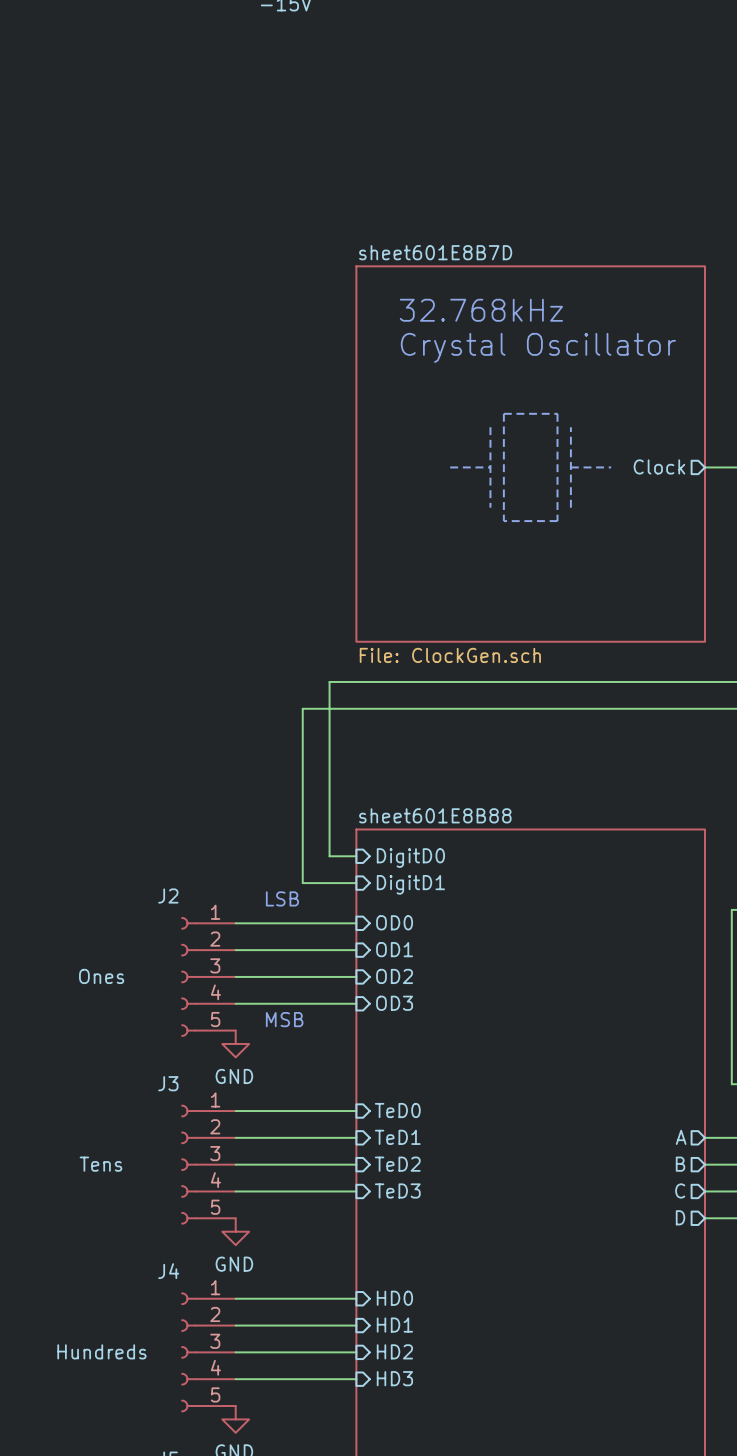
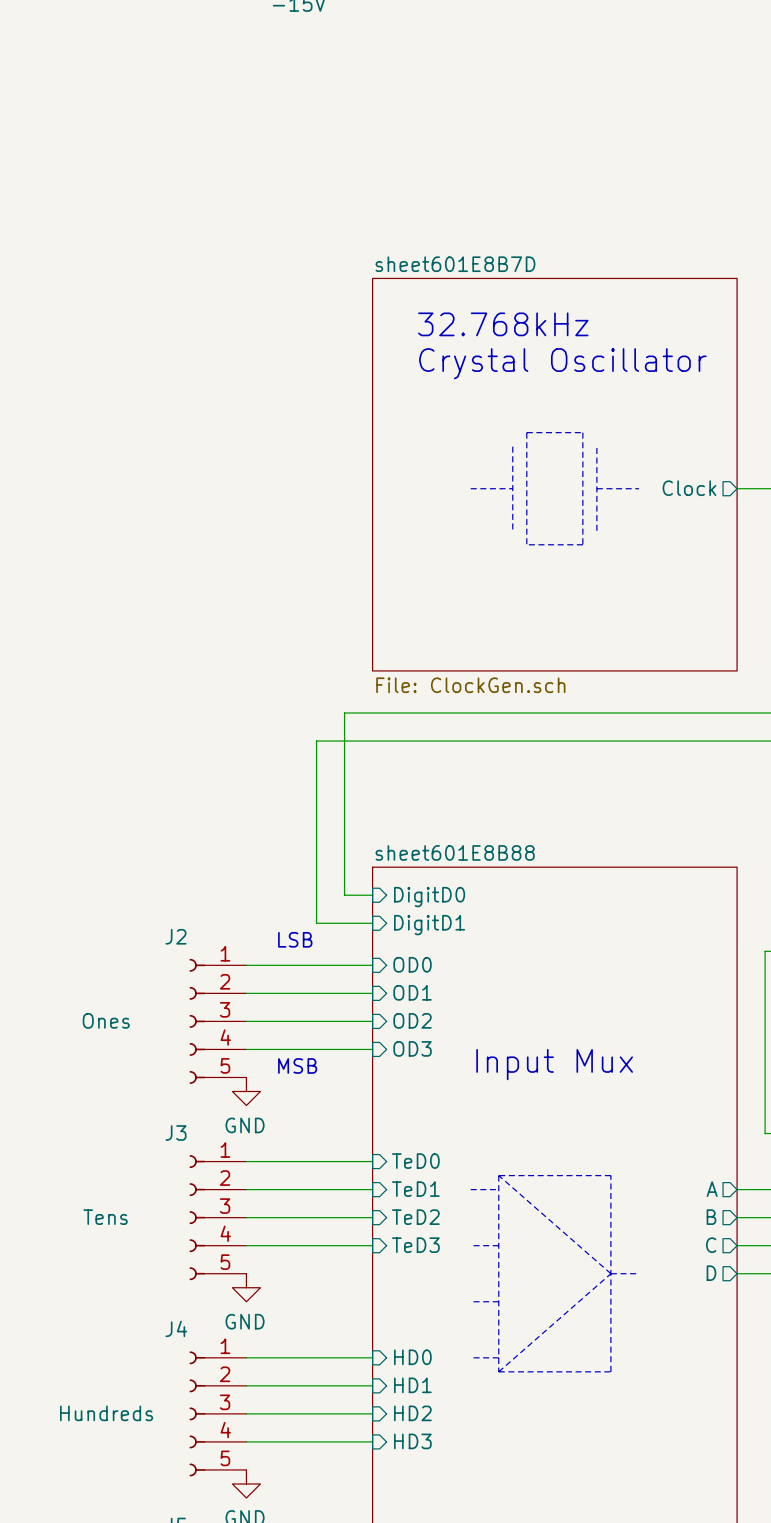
text: none -> Input Mux (554, 1064)
line: none -> (498, 1175) (610, 1175) (610, 1371) (498, 1371)
line: none -> (498, 1175) (498, 1371)
line: none -> (498, 1175) (610, 1273)
line: none -> (470, 1189) (498, 1189)
line: none -> (470, 1245) (498, 1245)
line: none -> (610, 1273) (498, 1371)
line: none -> (610, 1273) (638, 1273)
line: none -> (470, 1301) (498, 1301)
line: none -> (470, 1357) (498, 1357)

